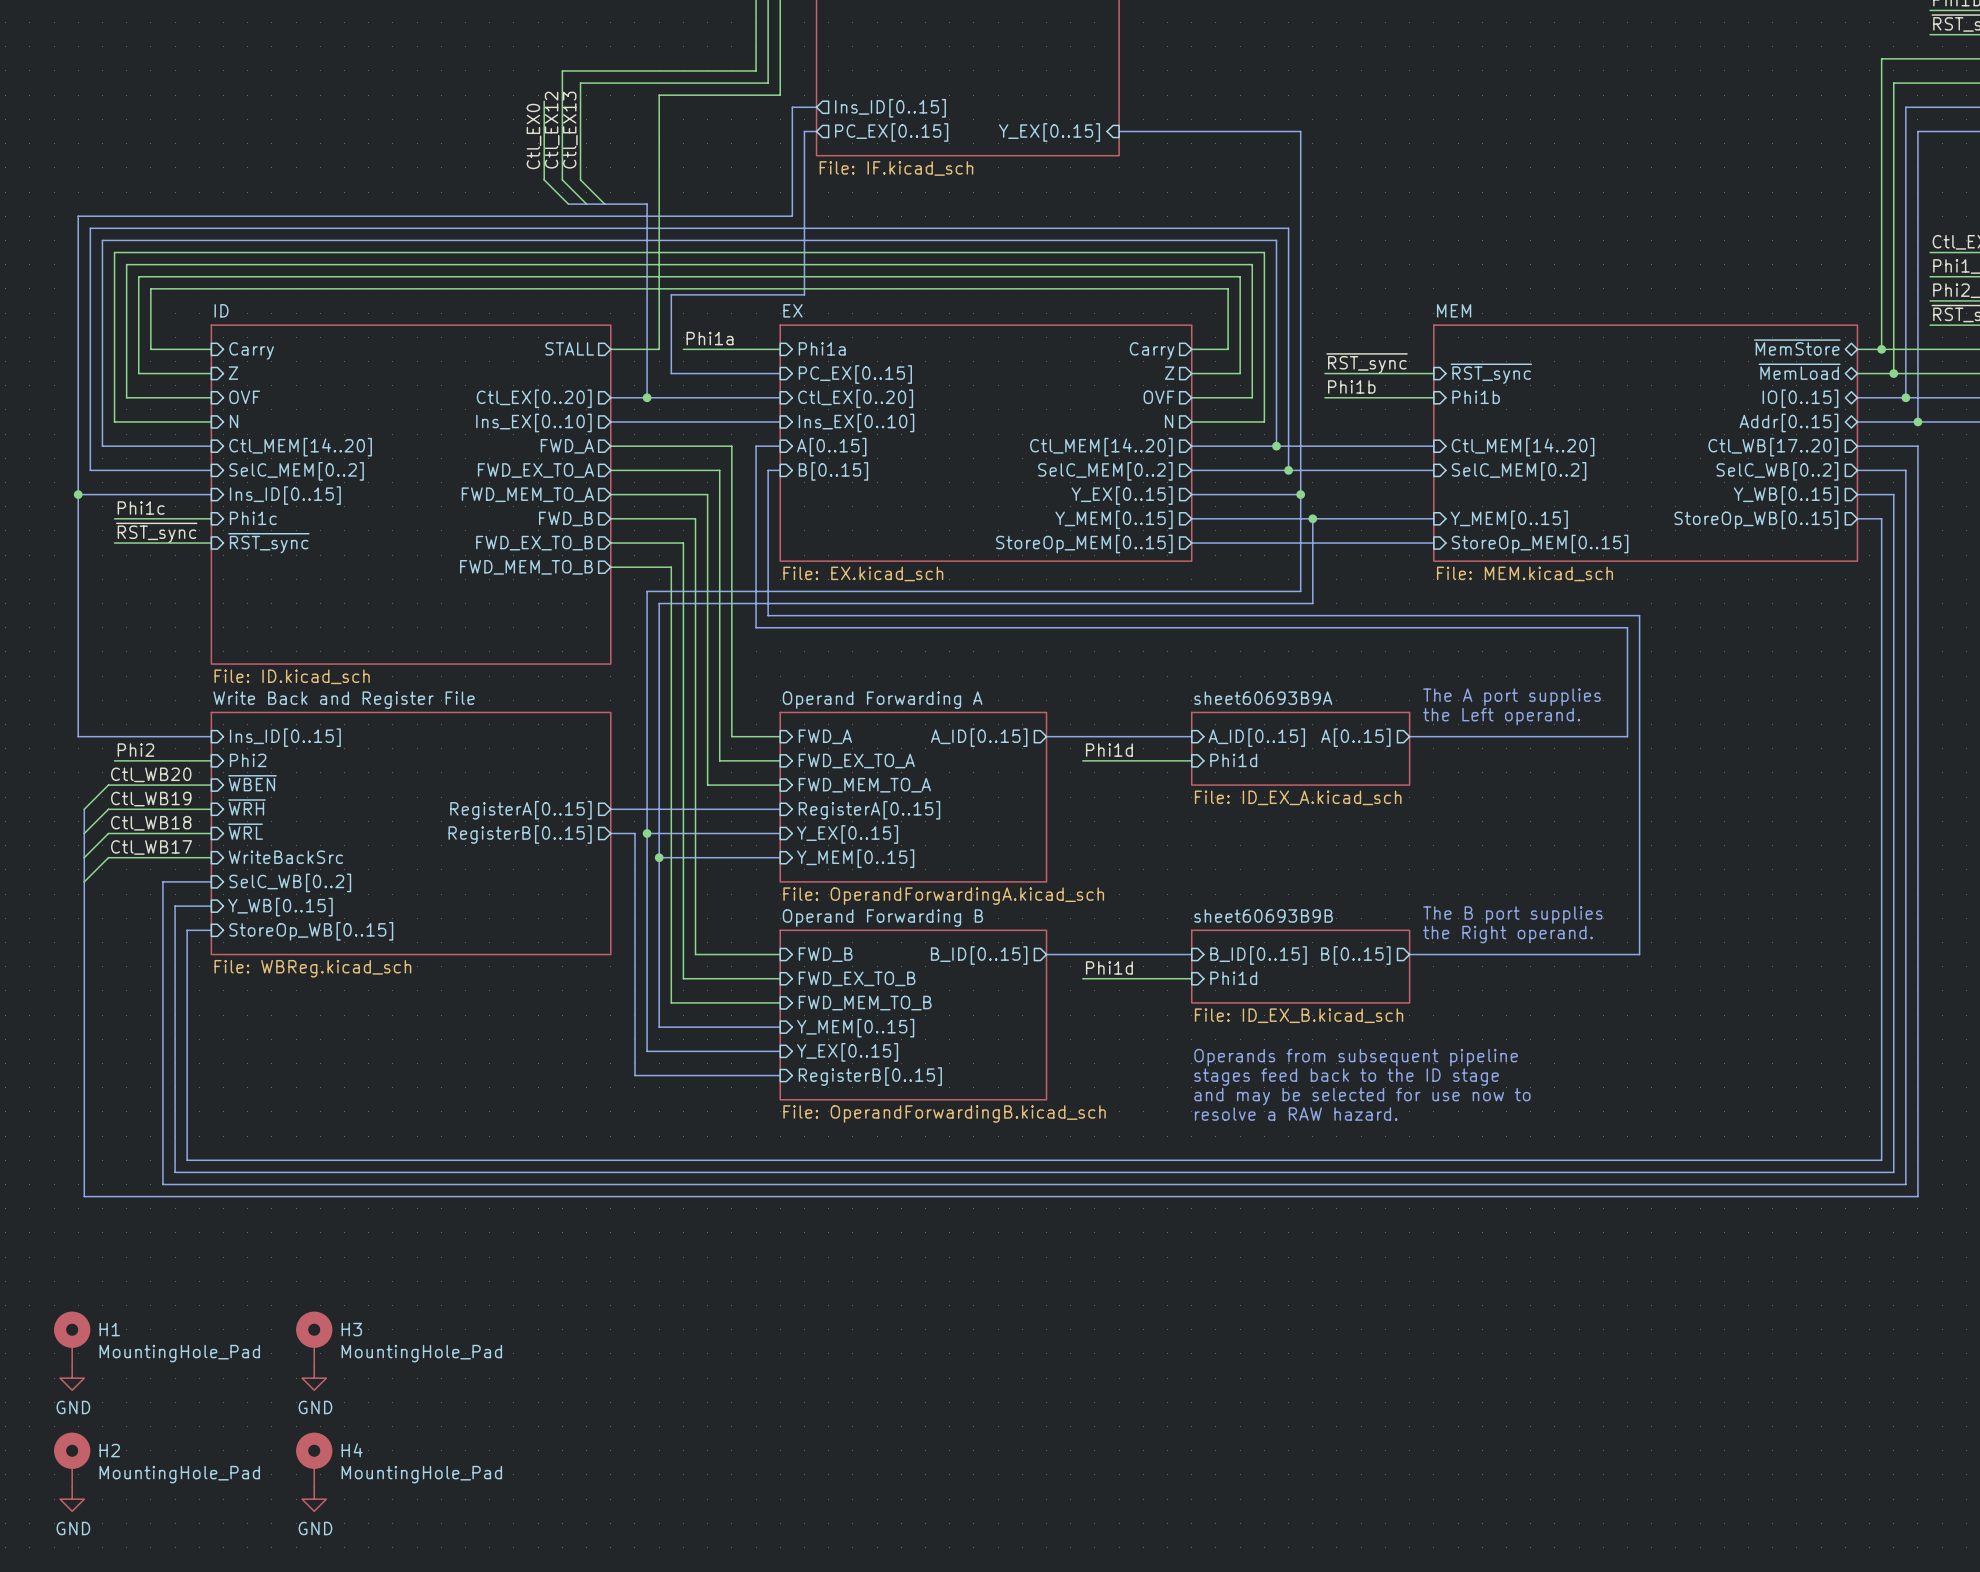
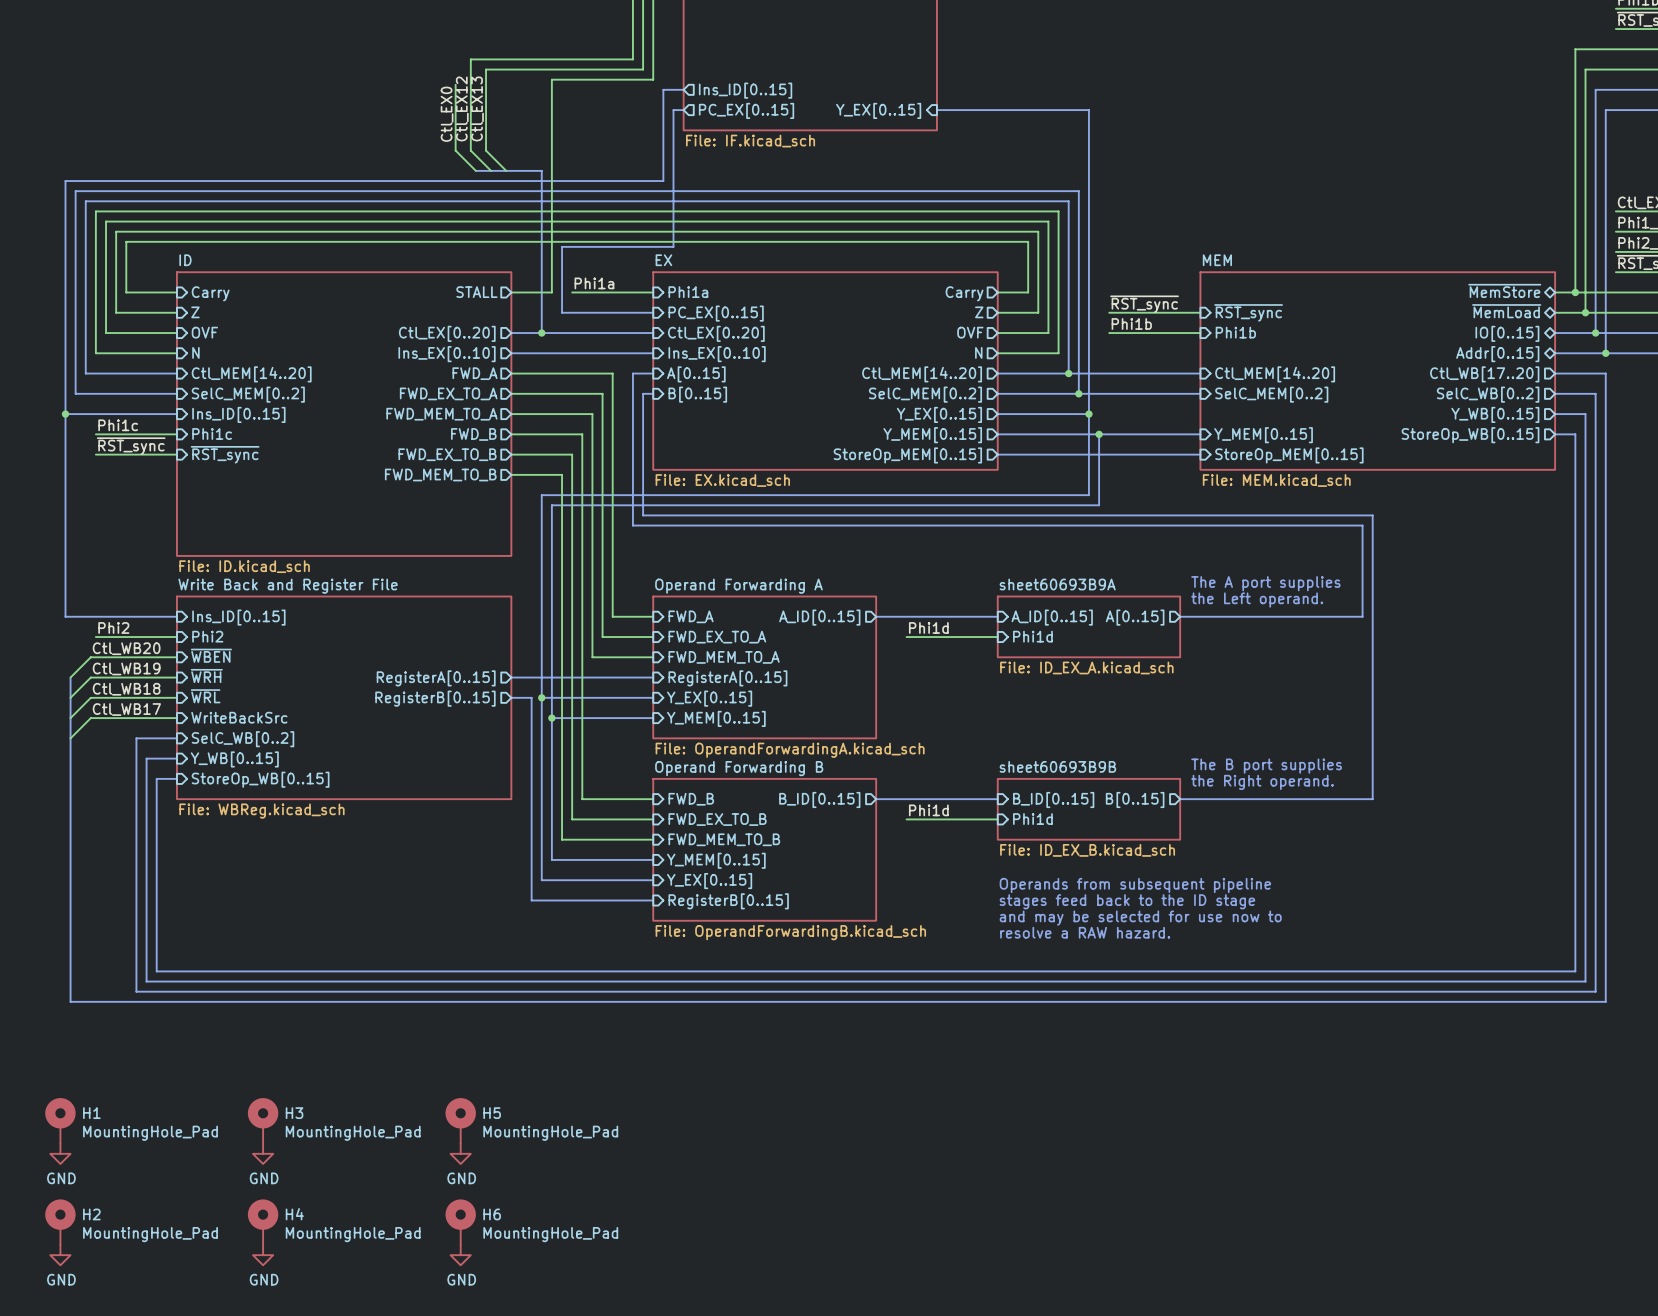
H5: none -> MountingHole_Pad (460, 1120)
power symbol: none -> GND (460, 1153)
H6: none -> MountingHole_Pad (460, 1222)
power symbol: none -> GND (460, 1255)

